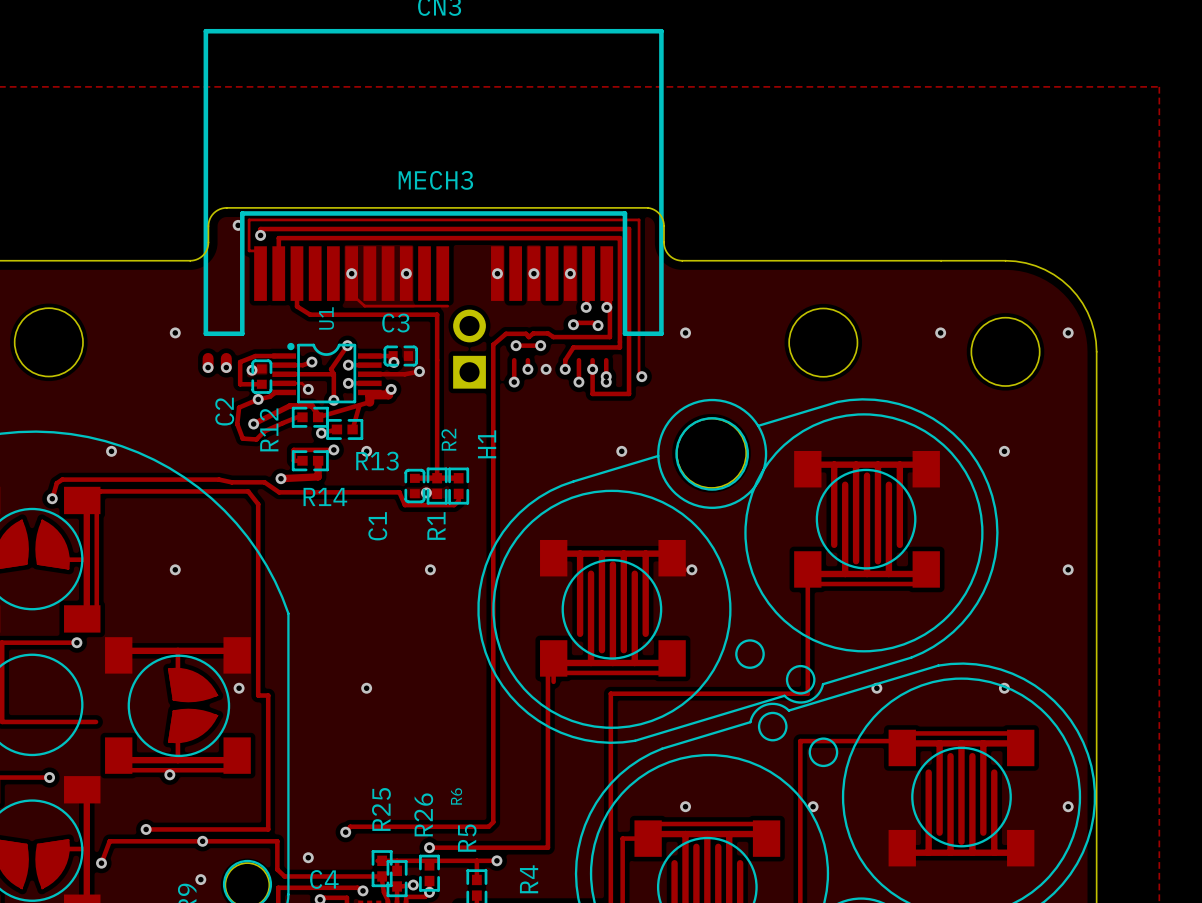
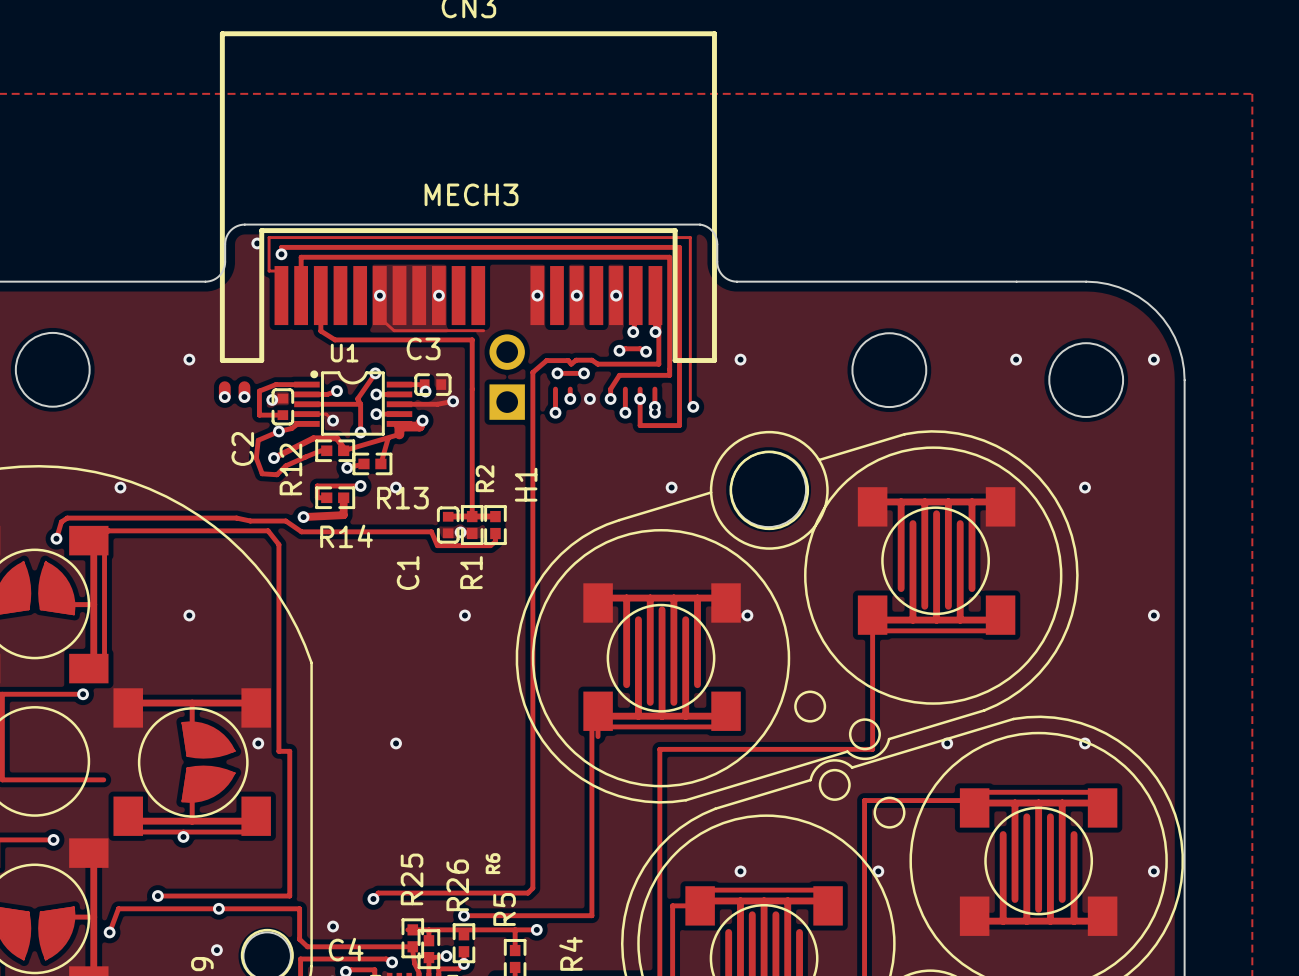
U1 name rotation: 0° (326, 318) -> 90° clockwise (344, 353)

